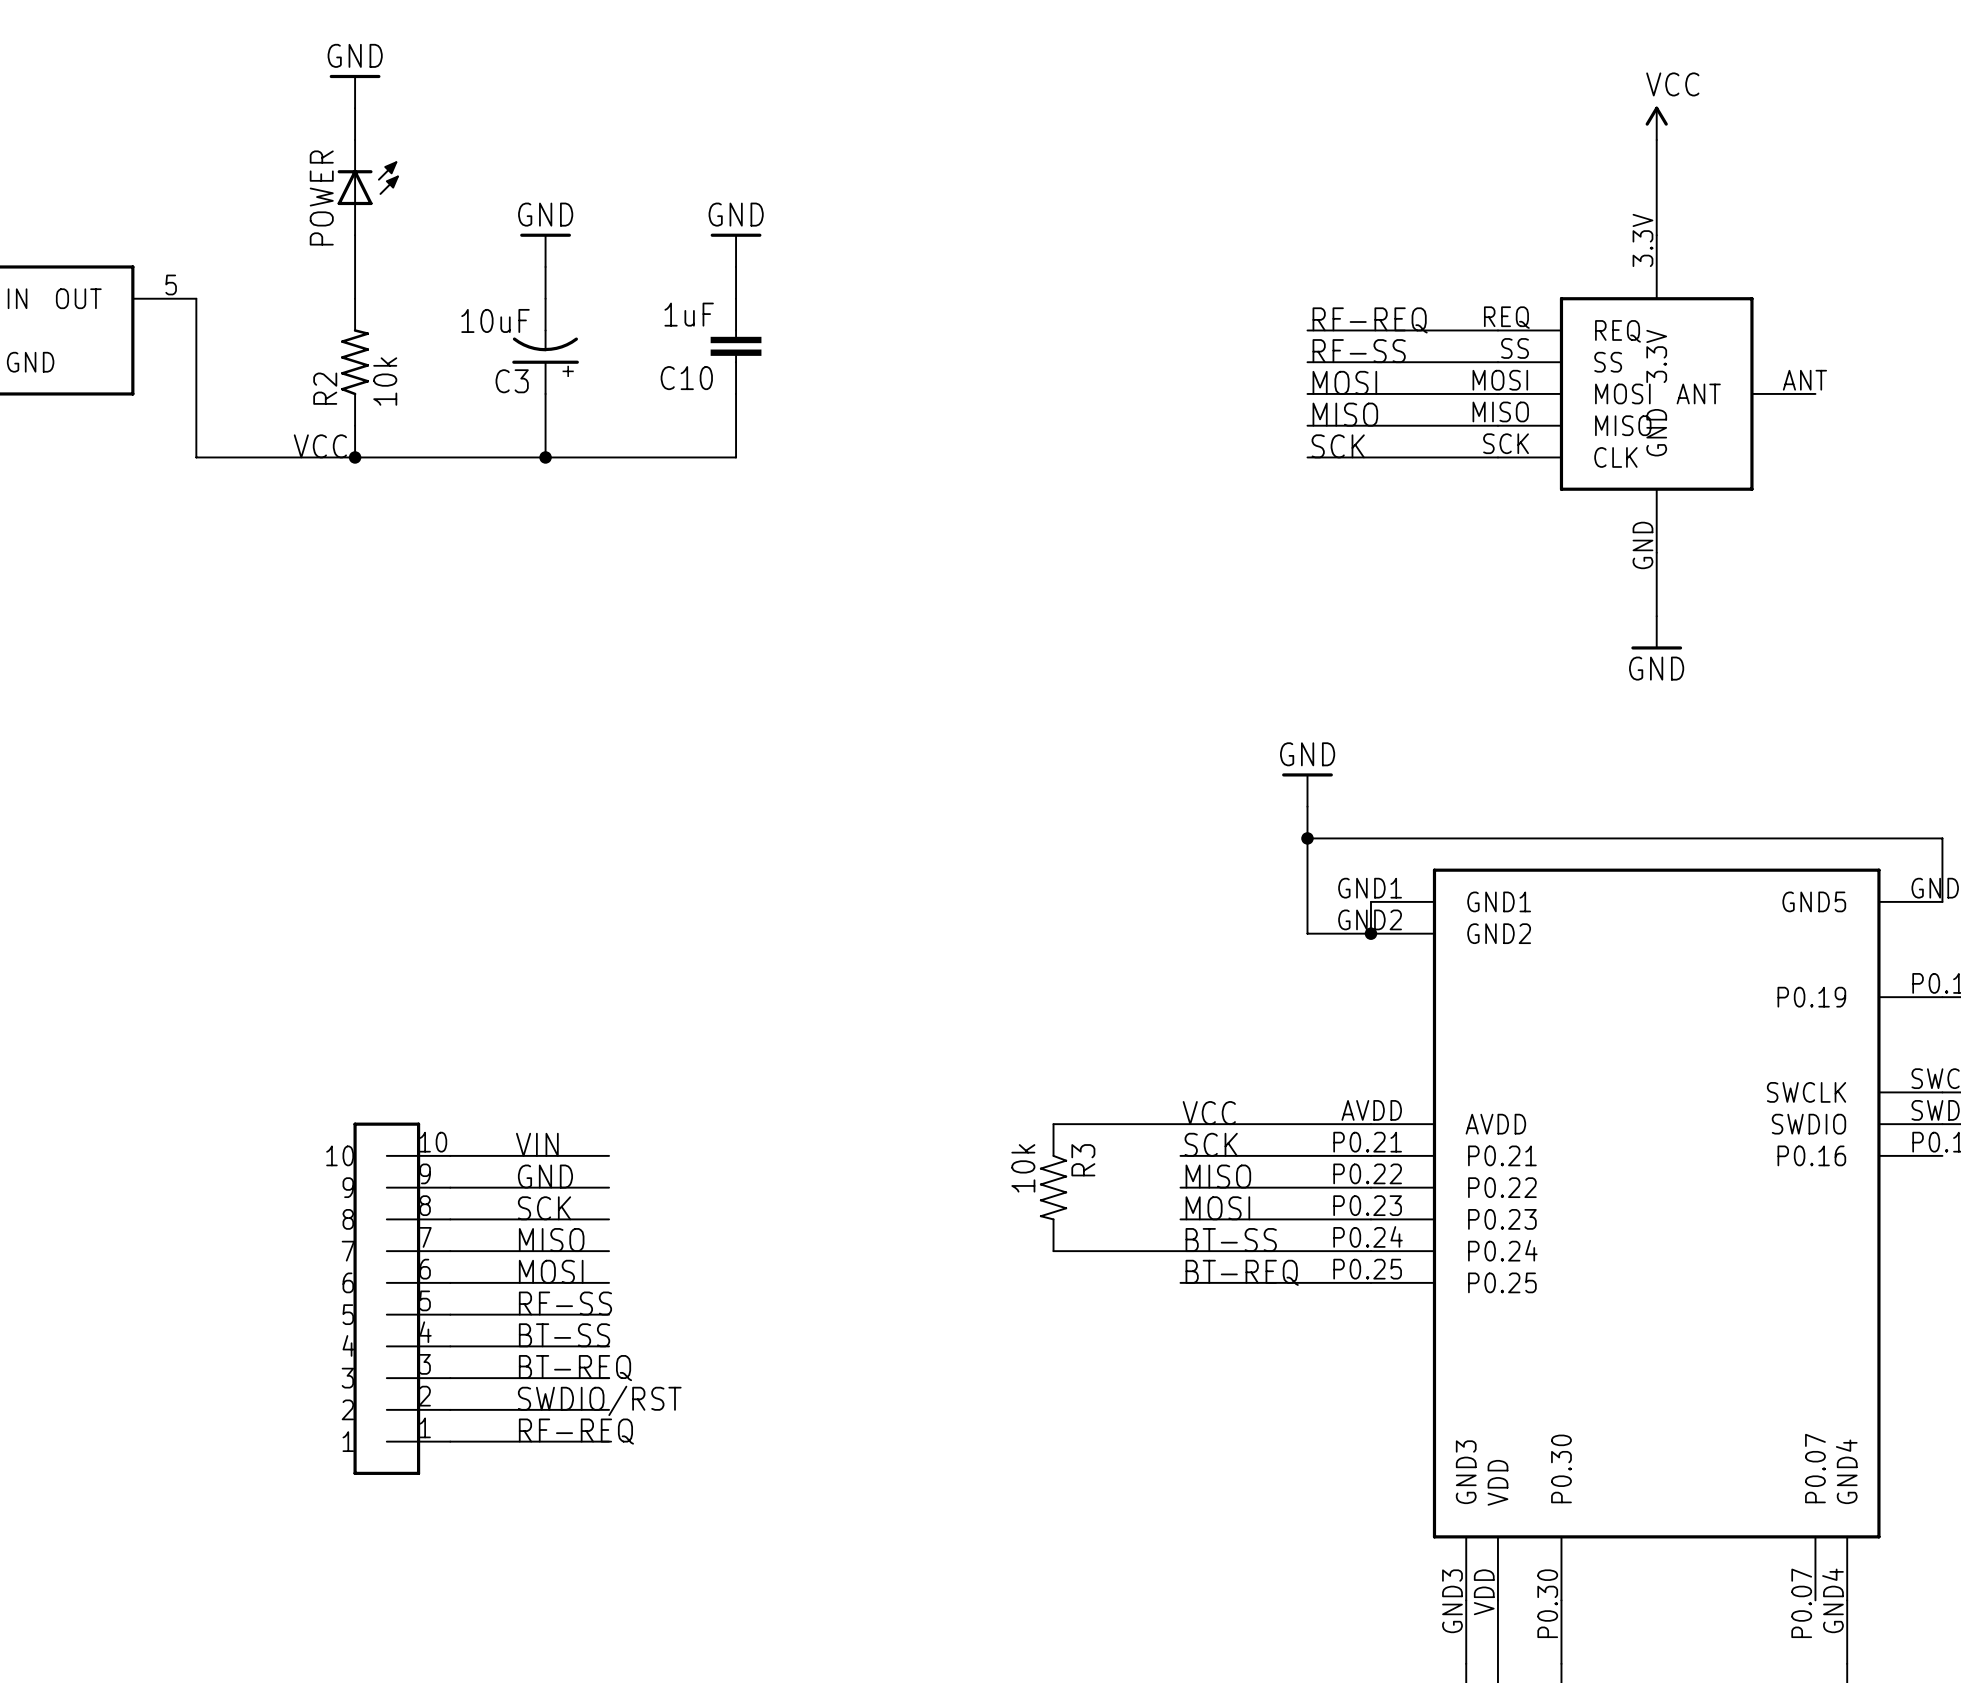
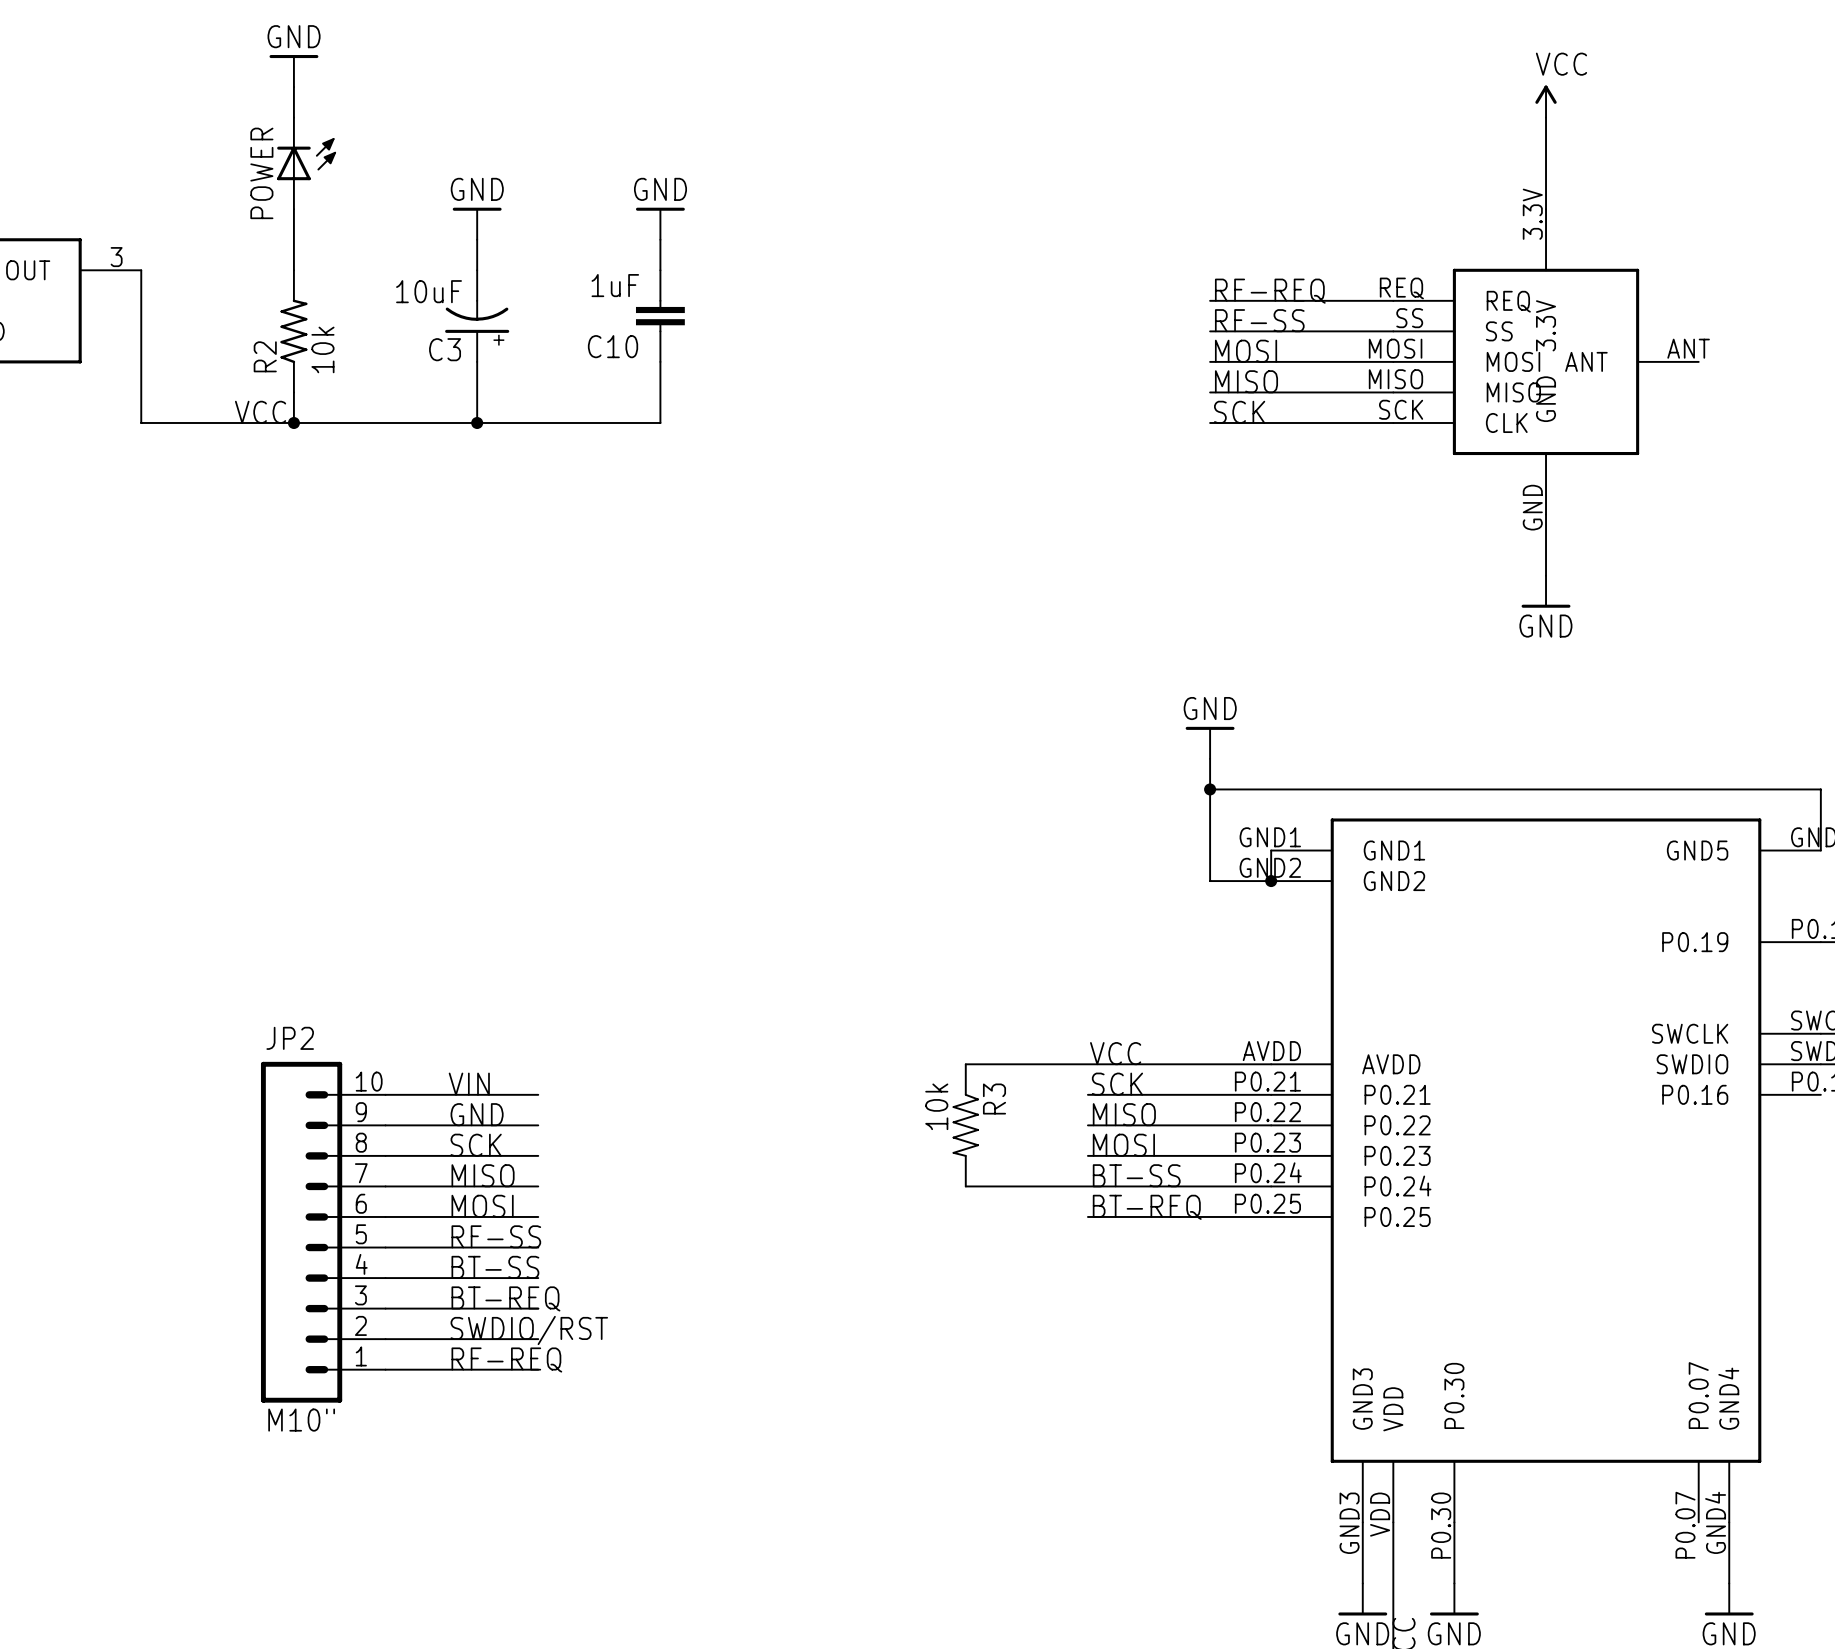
part pin number: 5 (171, 284) -> 3 (116, 257)
JP2: none -> M10" (323, 1232)
part: (401, 1298) -> none

